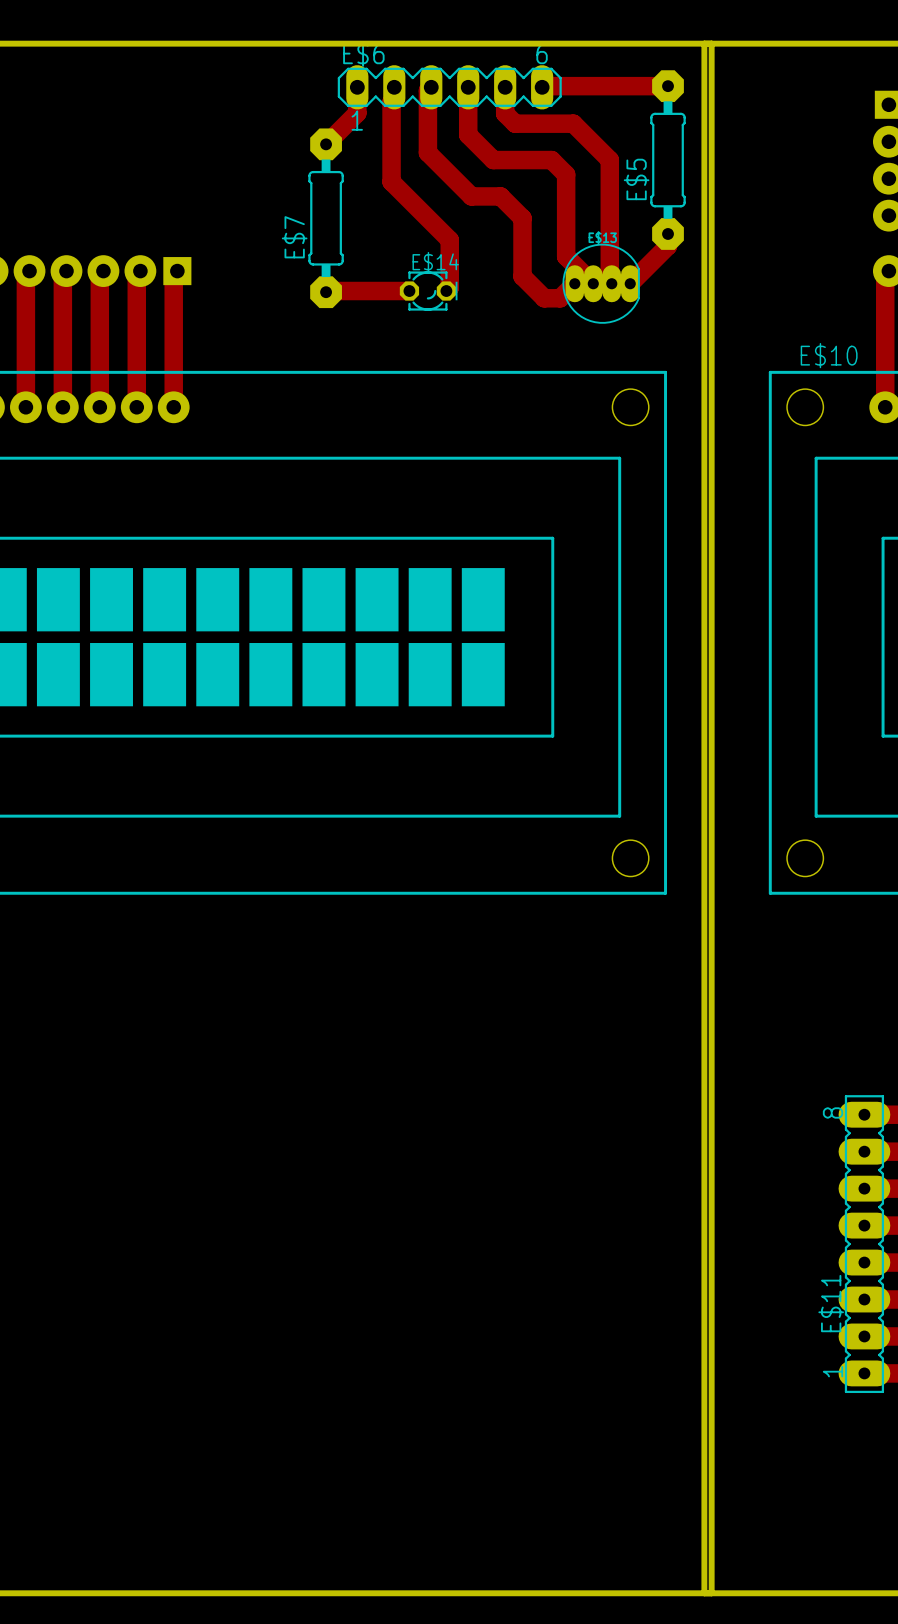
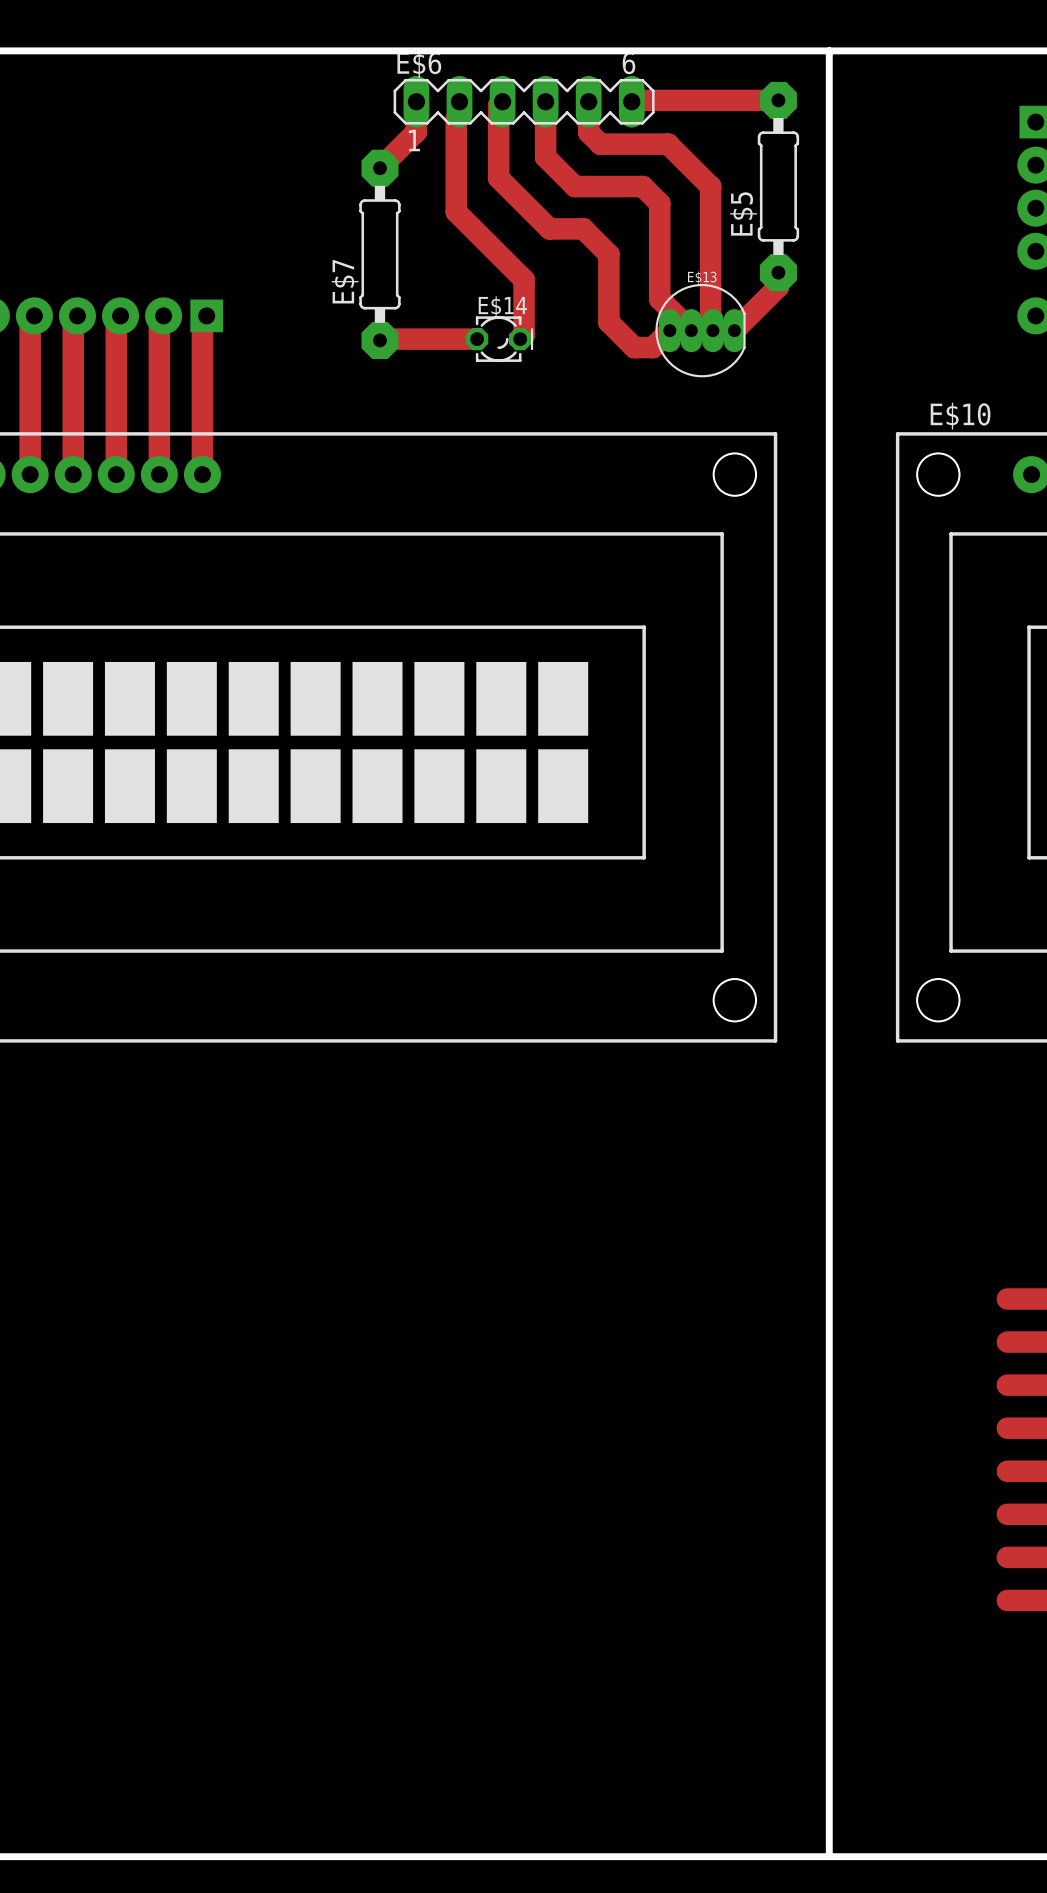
board edge: (704, 43) (704, 1593) -> none
top track: (888, 271) (885, 274) (885, 407) -> none
E$11: (864, 1244) -> none

